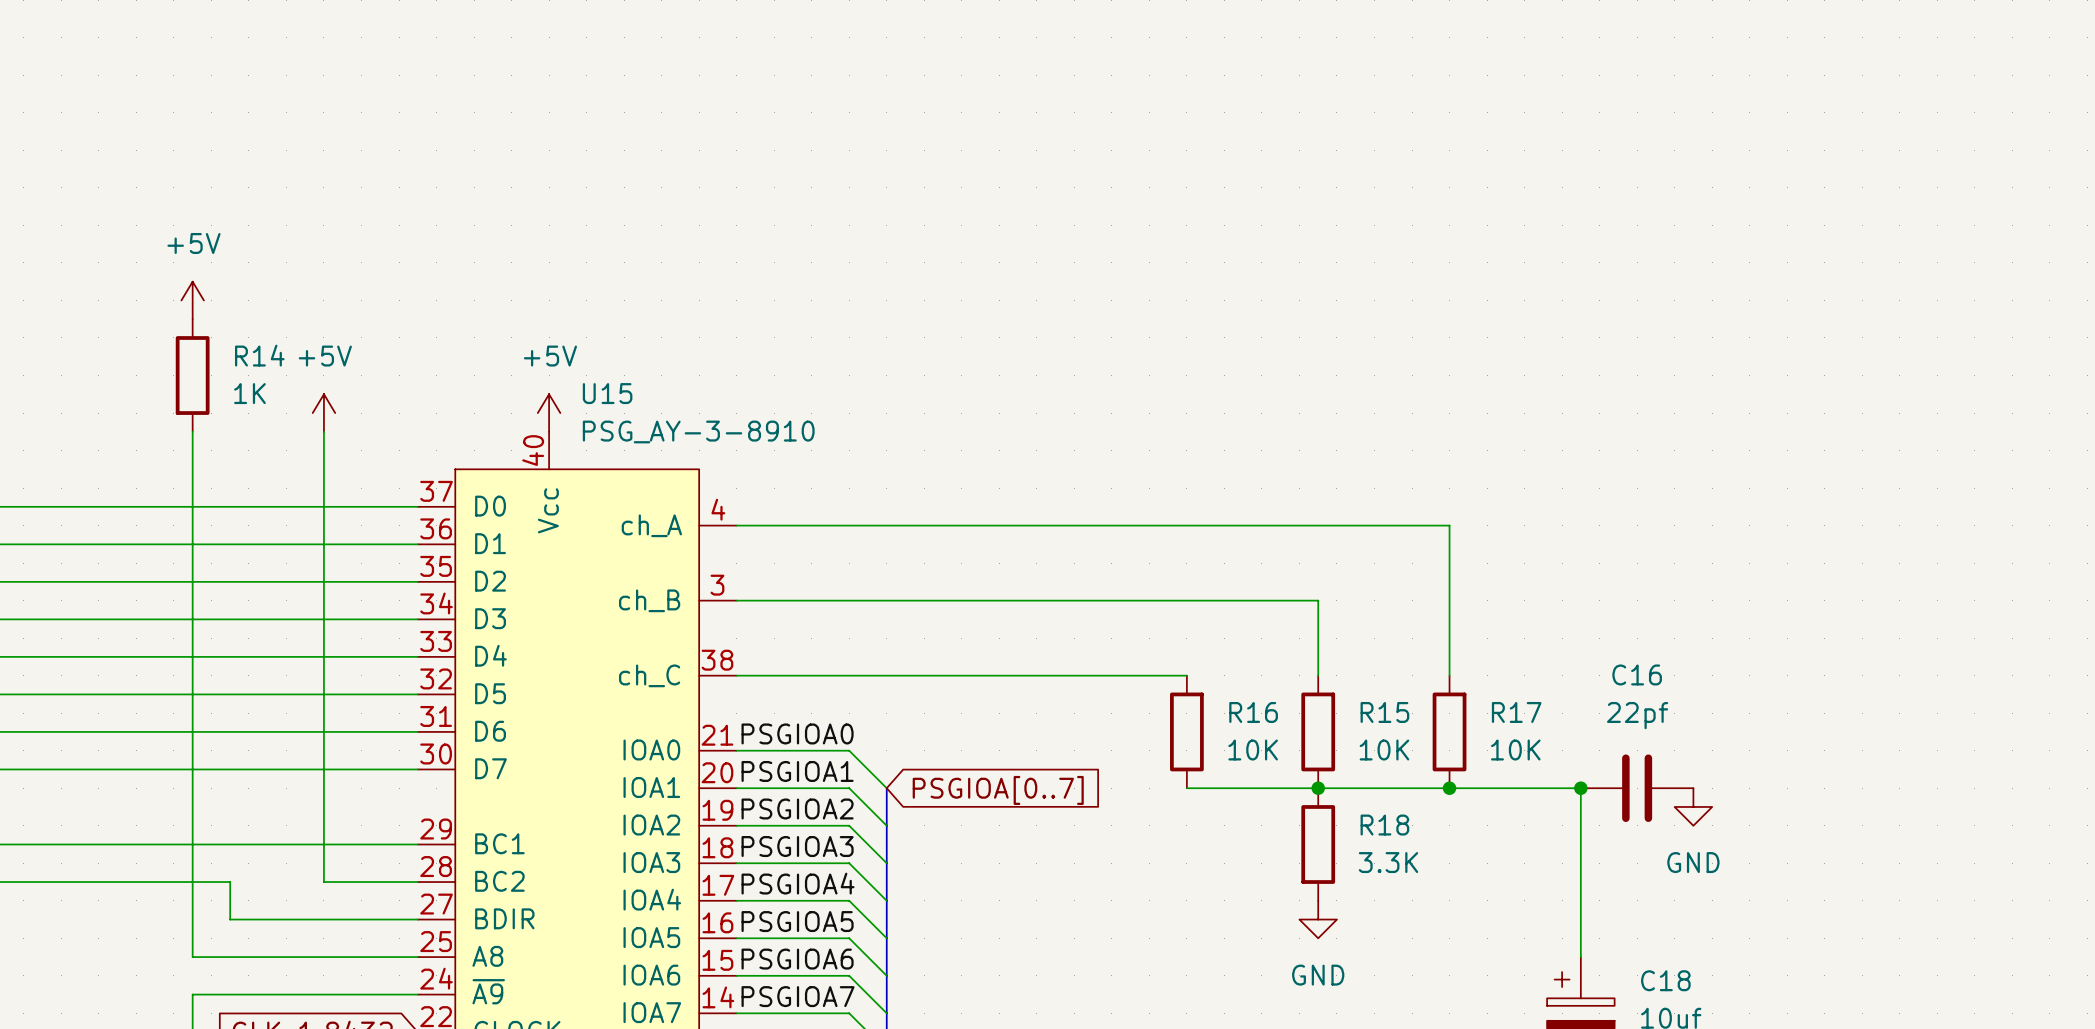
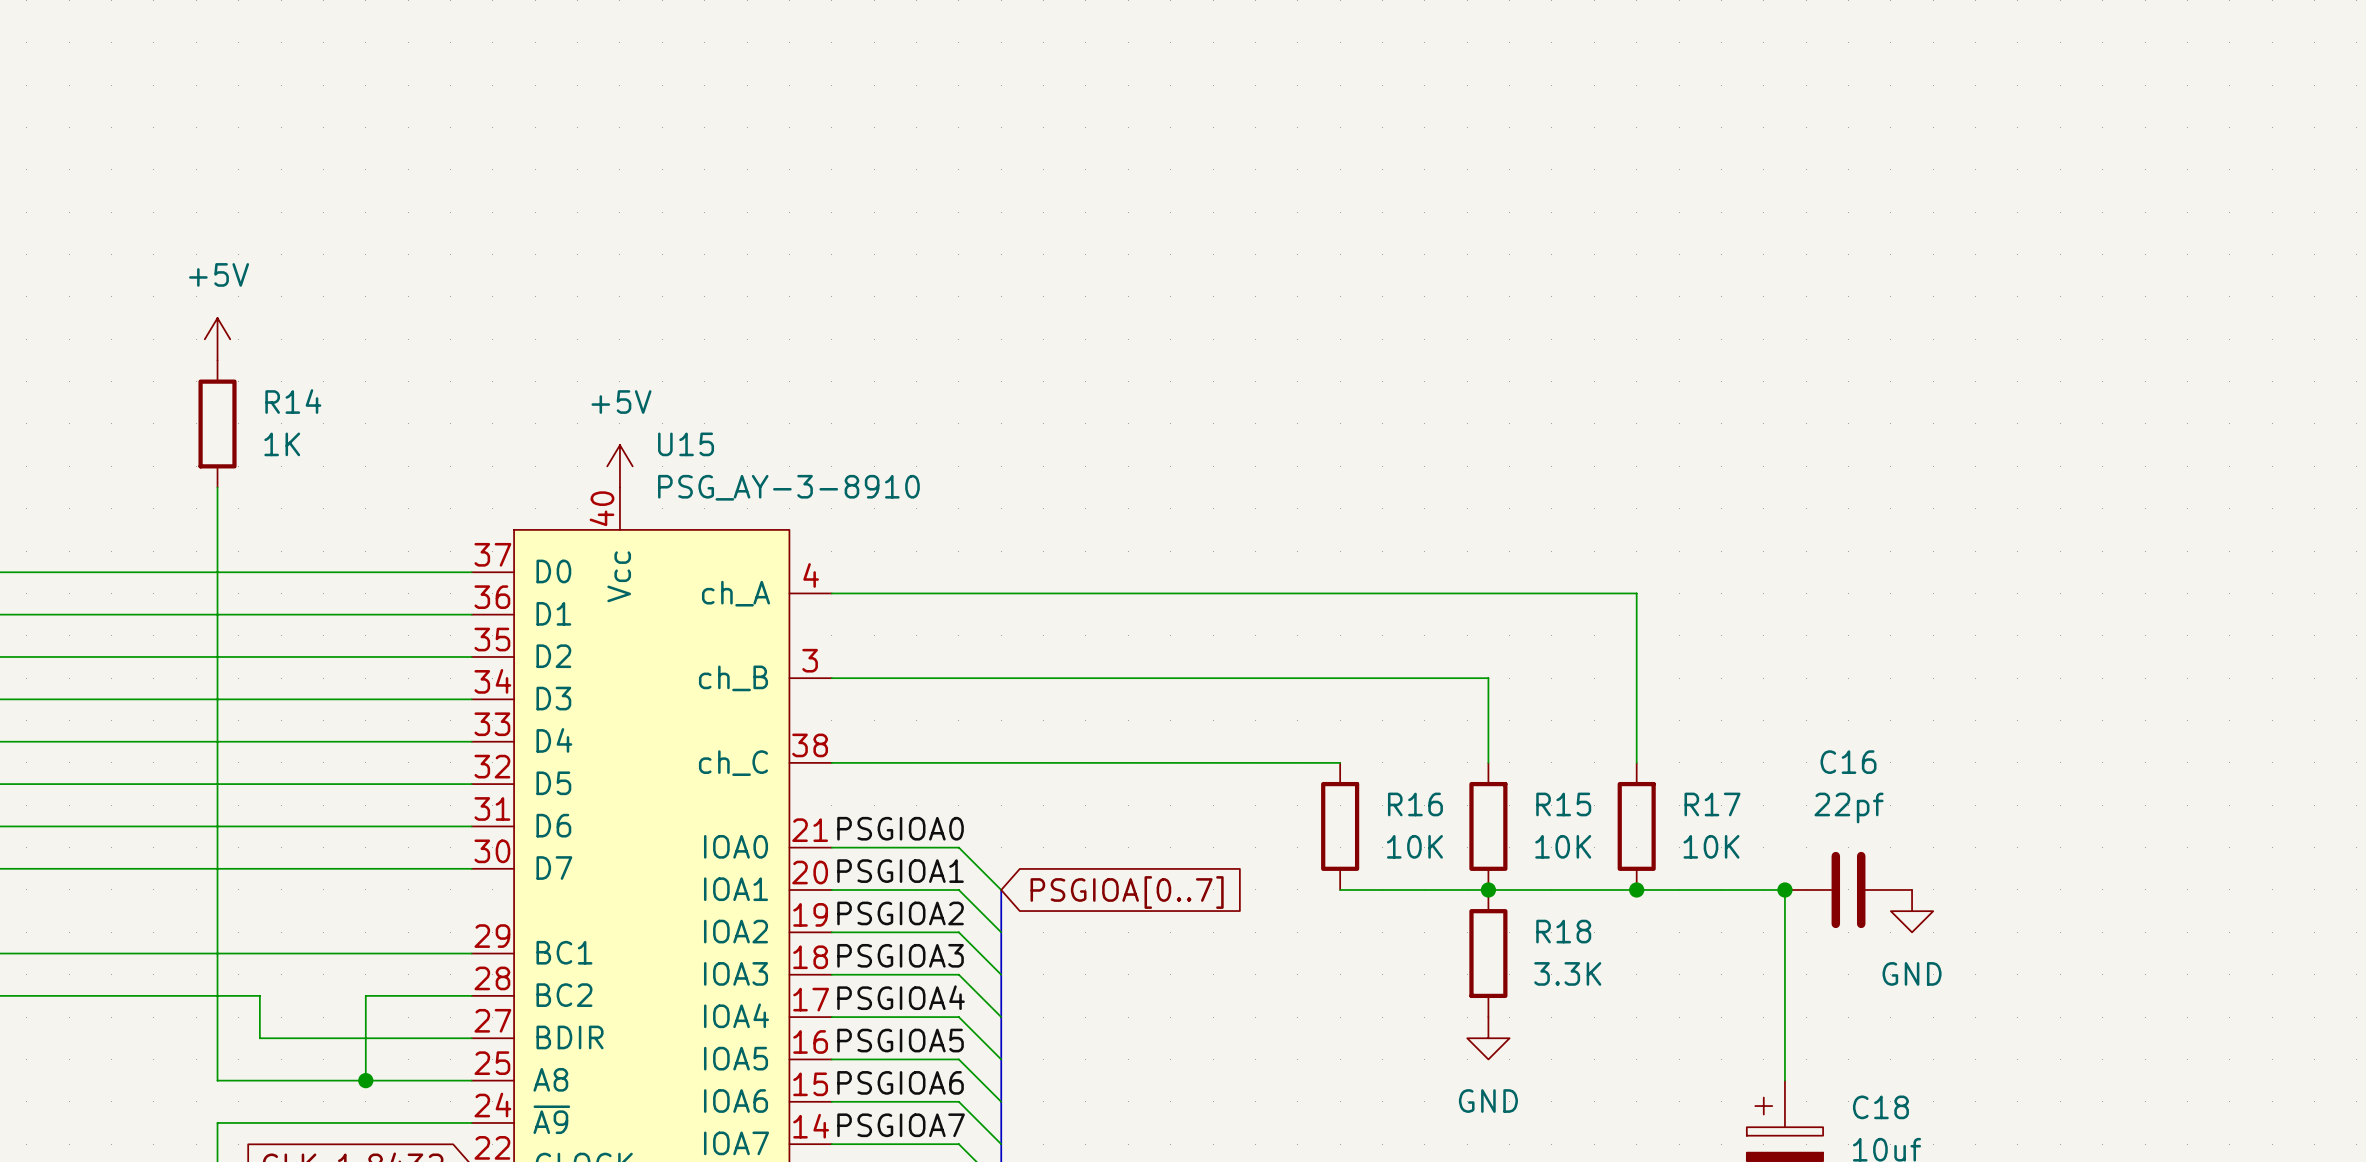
power symbol: +5V (323, 413) -> none
wire: (323, 431) (323, 882) -> (365, 1080) (365, 995)
junction: none -> (365, 1080)

